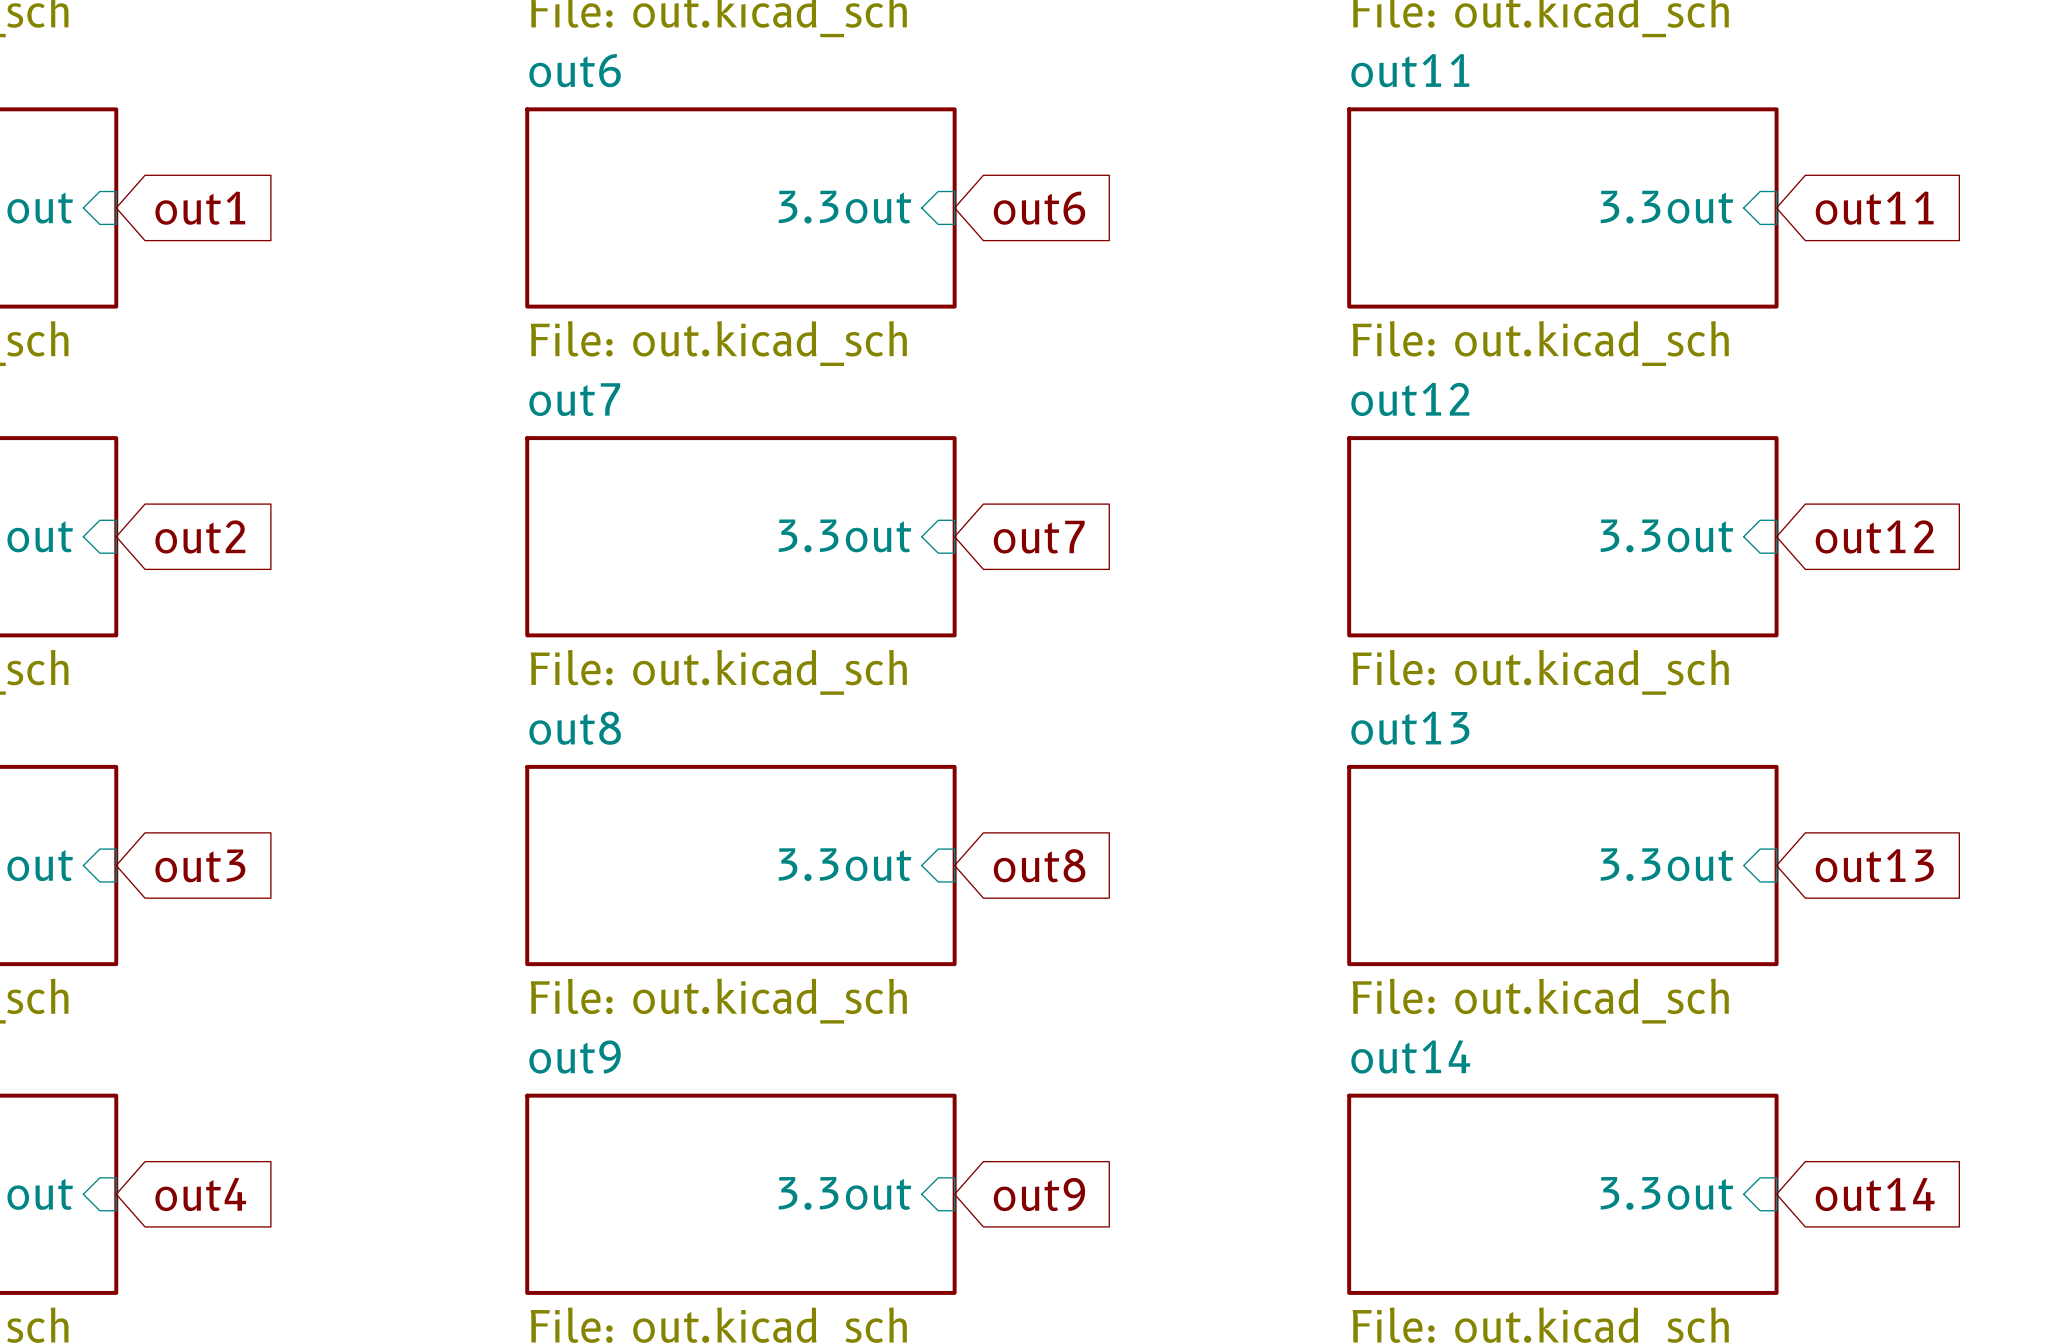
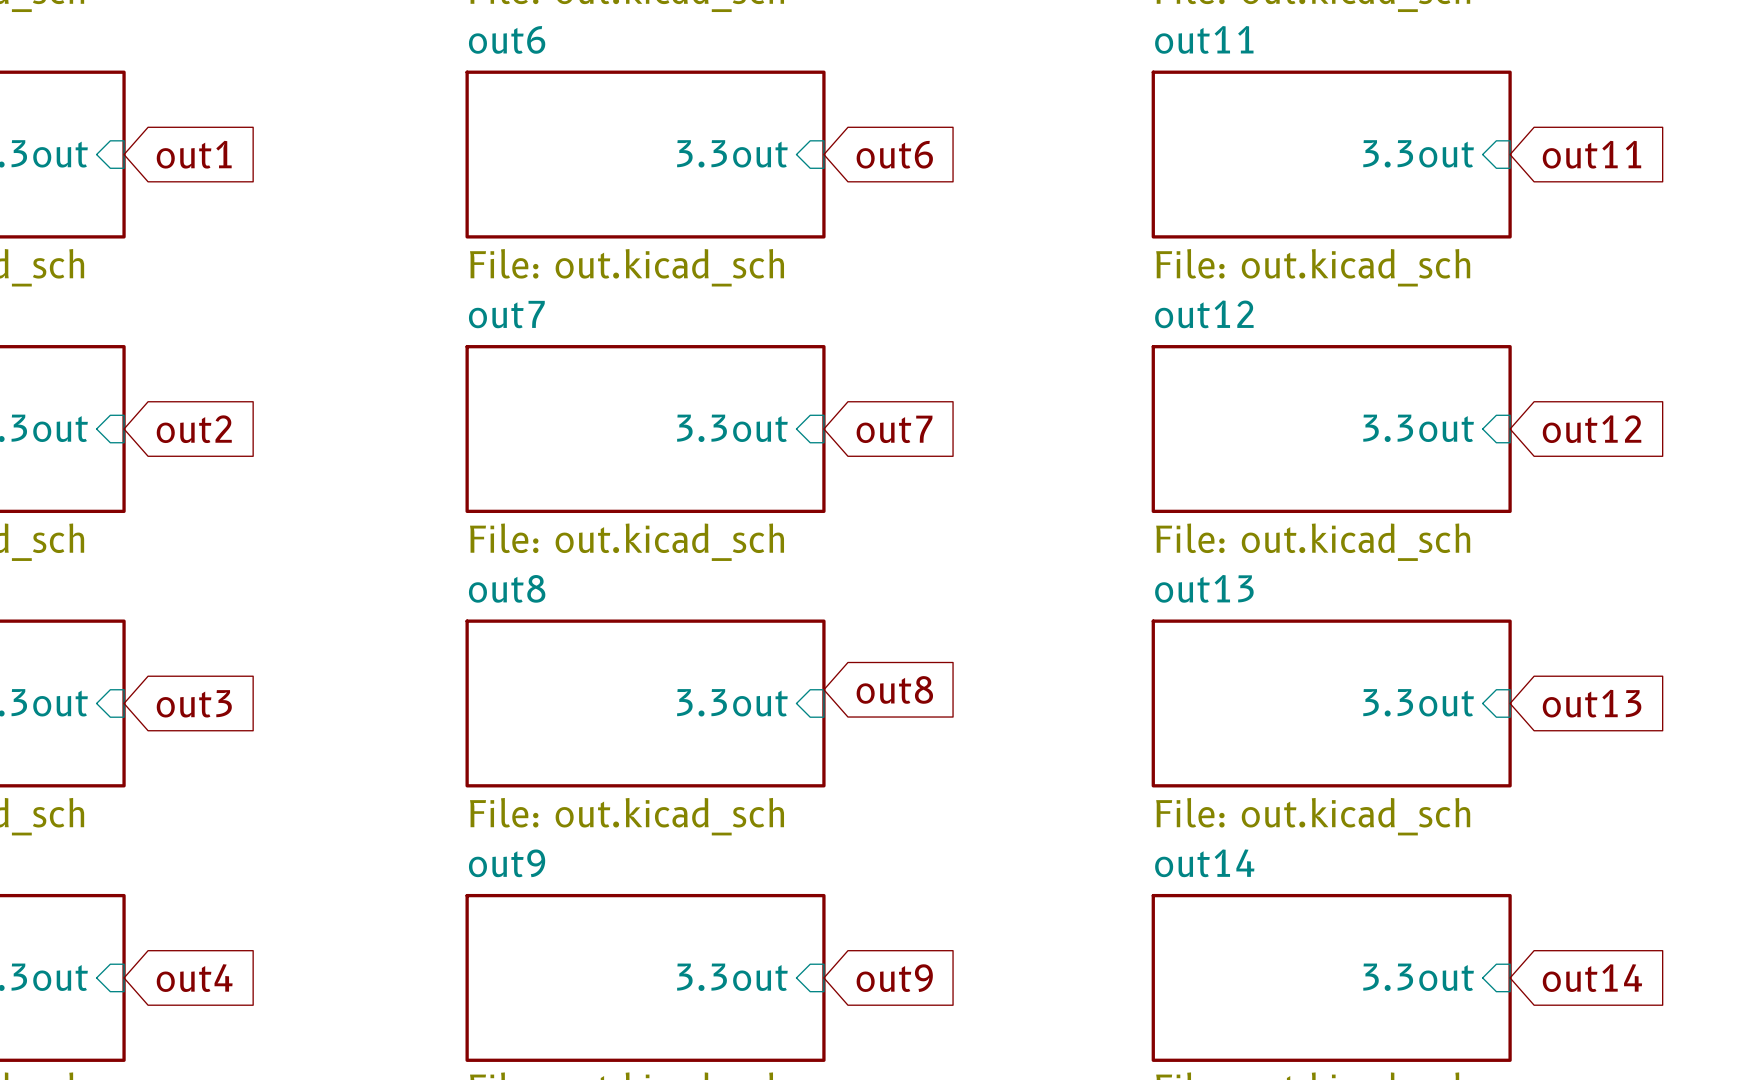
global label position: out8 (1039, 865) -> out8 (894, 689)

